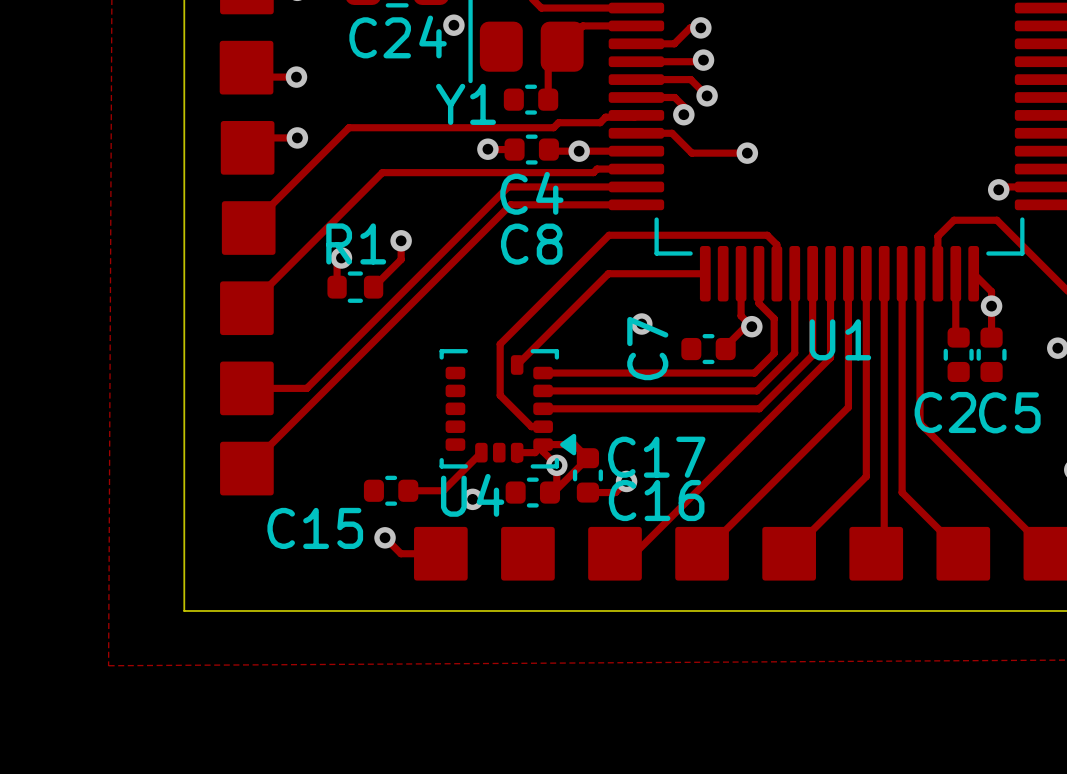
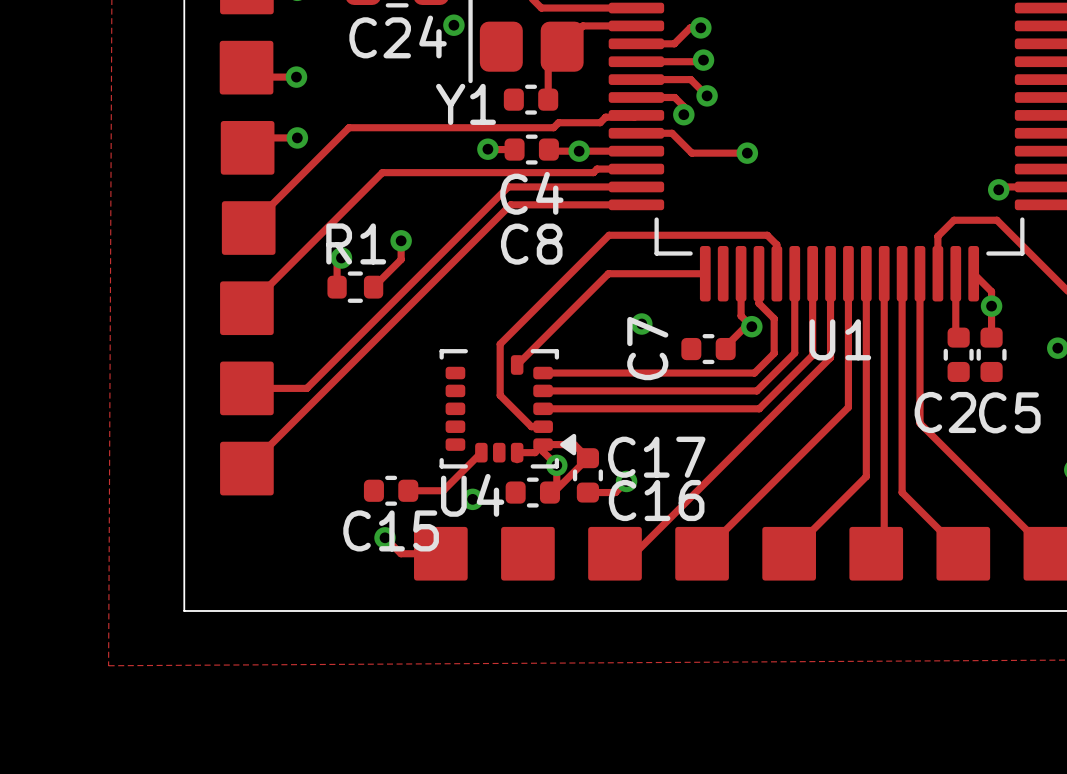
C15 name position: C15 (315, 528) -> C15 (391, 530)

